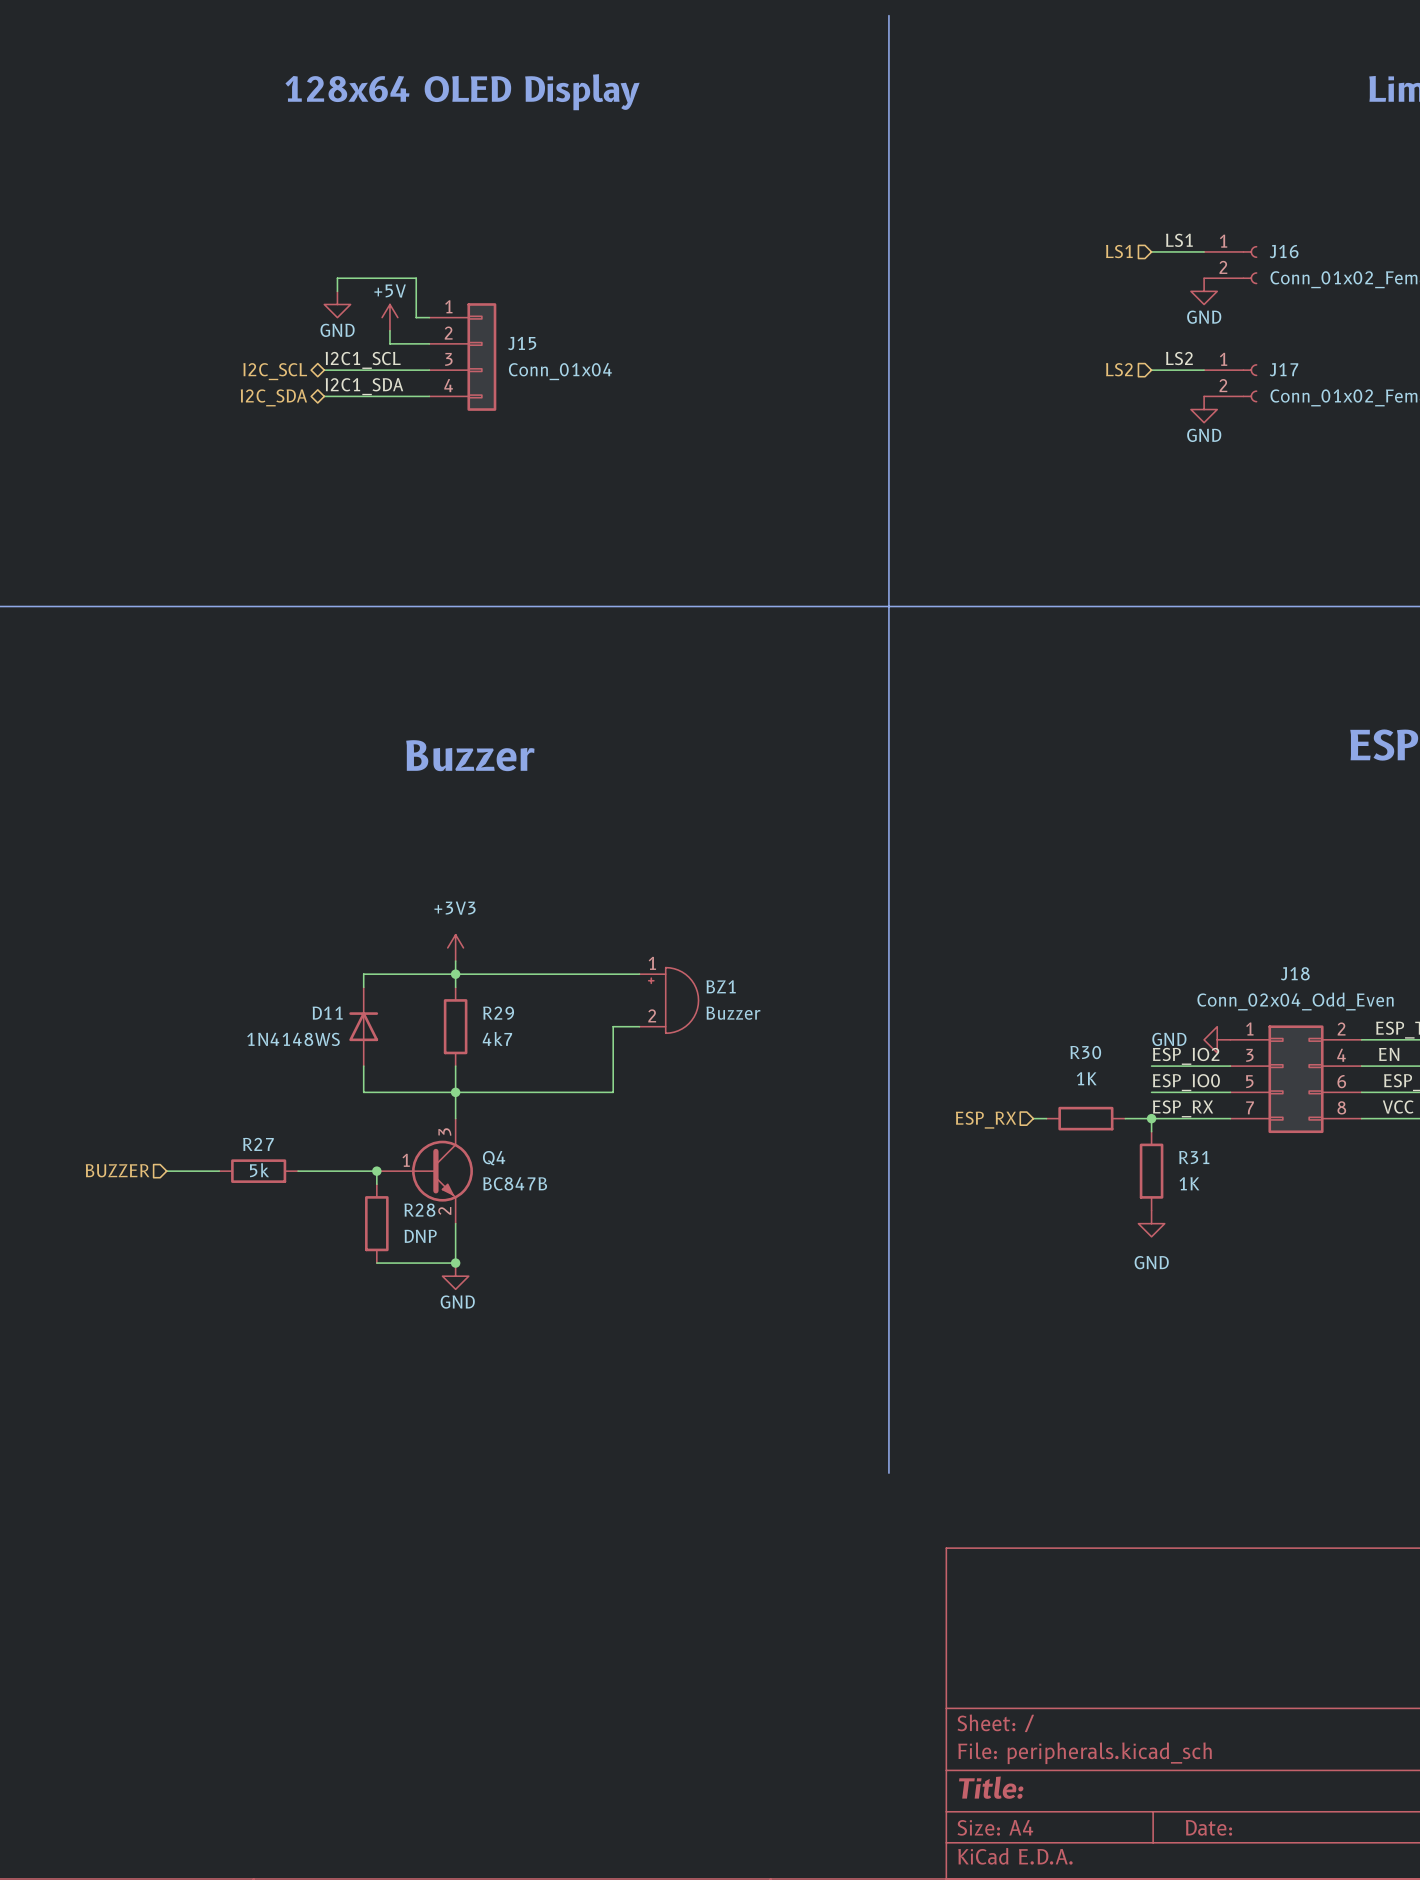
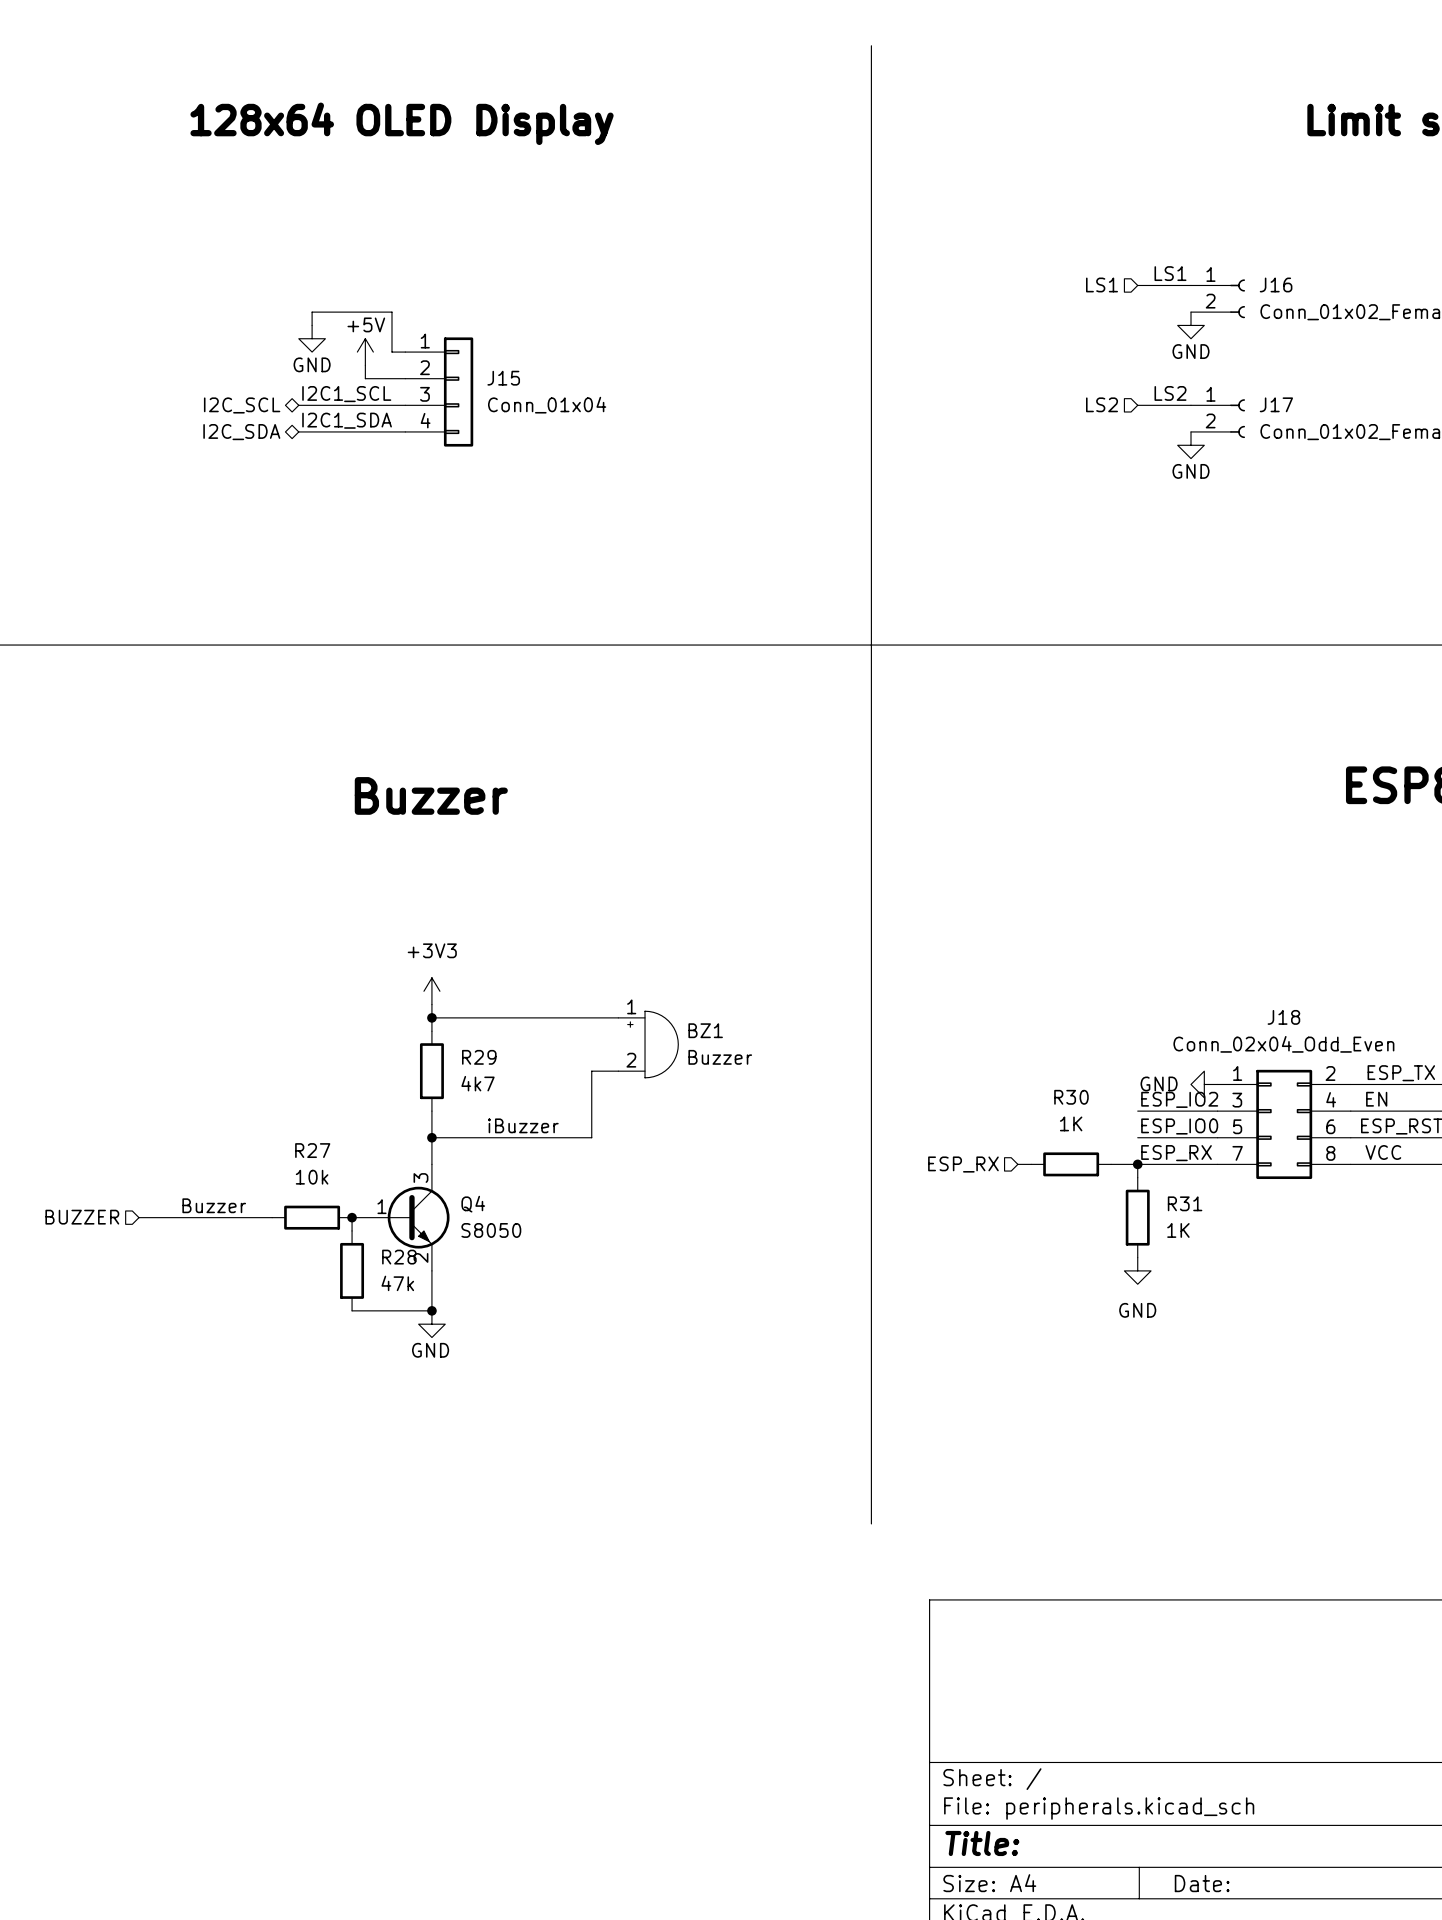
wire: (455, 974) (363, 974) (363, 987) -> none
D11: 1N4148WS (363, 1026) -> none
wire: (363, 1066) (363, 1092) (455, 1092) -> none
label: none -> iBuzzer (523, 1125)
R27 name position: R27 (258, 1144) -> R27 (312, 1150)
label: none -> Buzzer (214, 1205)
R27 value: 5k (259, 1170) -> 10k (312, 1177)
R27 position: (258, 1171) -> (312, 1217)
wire: (298, 1171) (376, 1171) -> (272, 1217) (192, 1217)
Q4 value: BC847B (515, 1183) -> S8050 (491, 1230)
R28 value: DNP (420, 1236) -> 47k (397, 1283)

